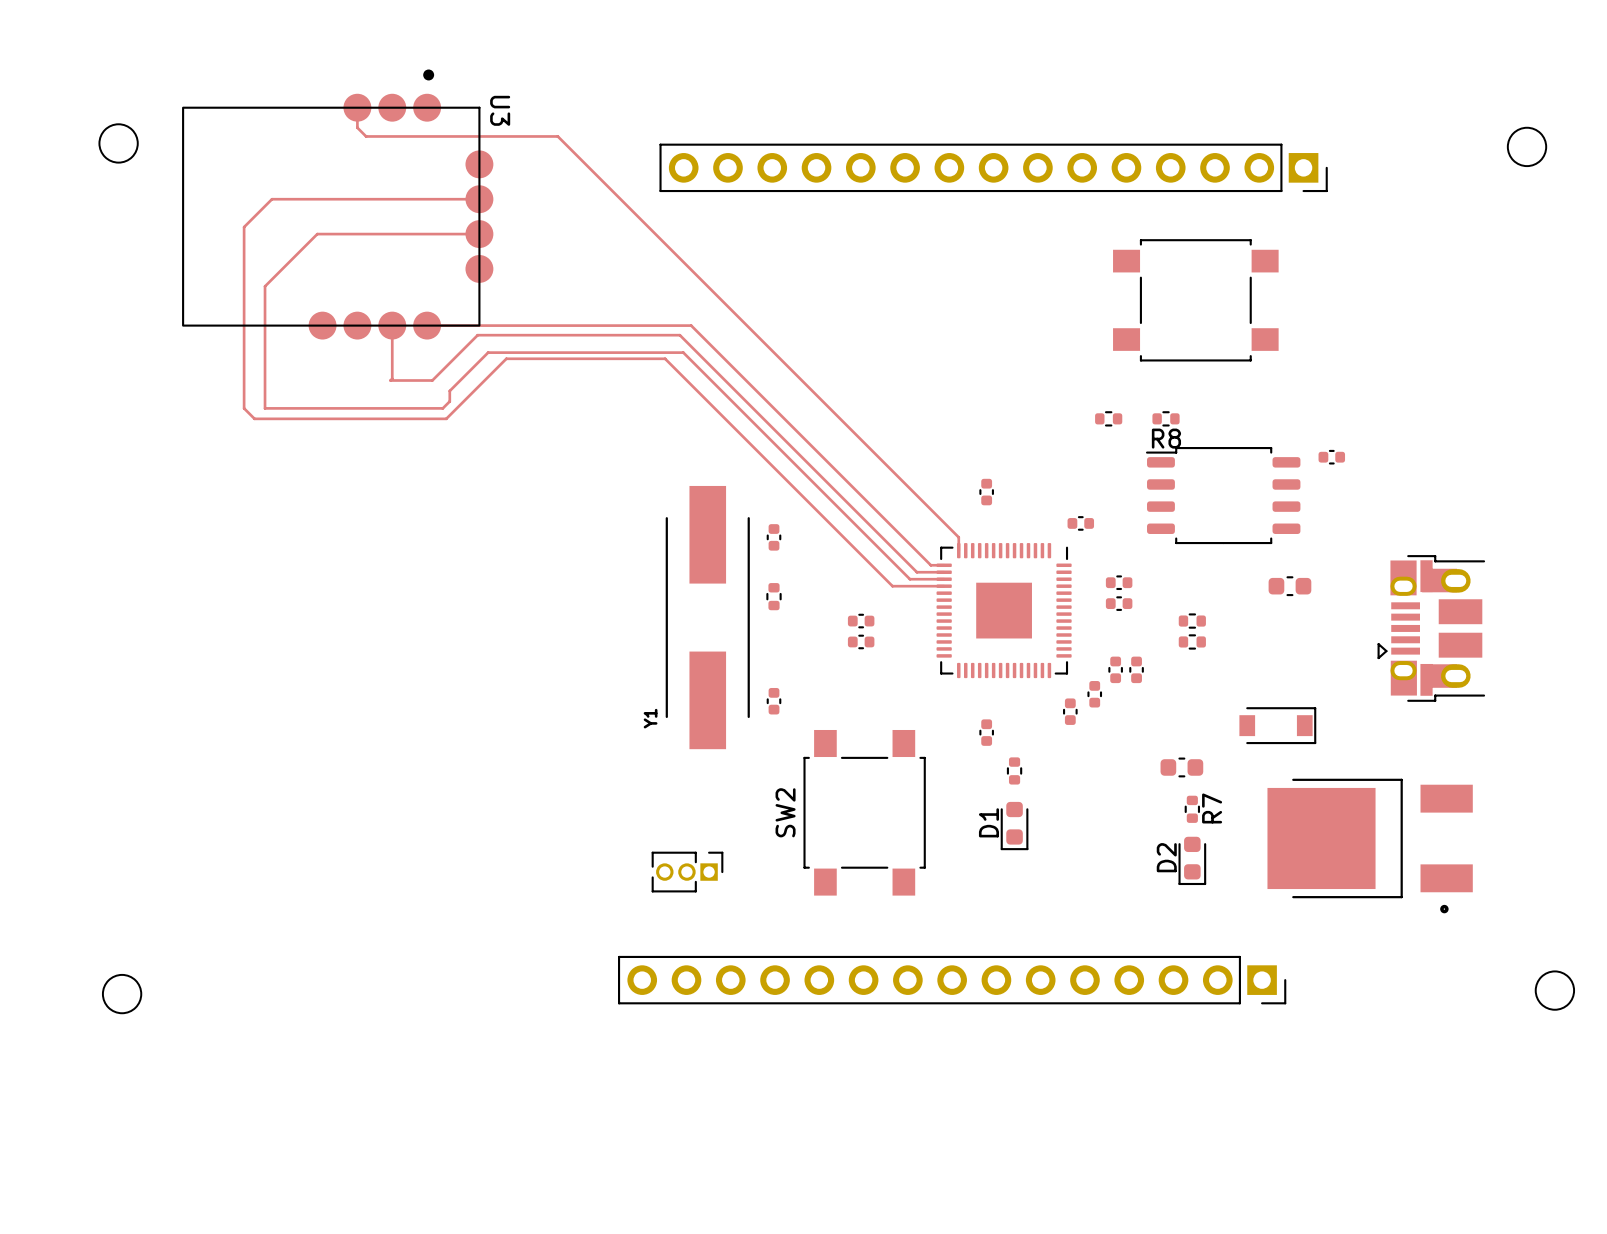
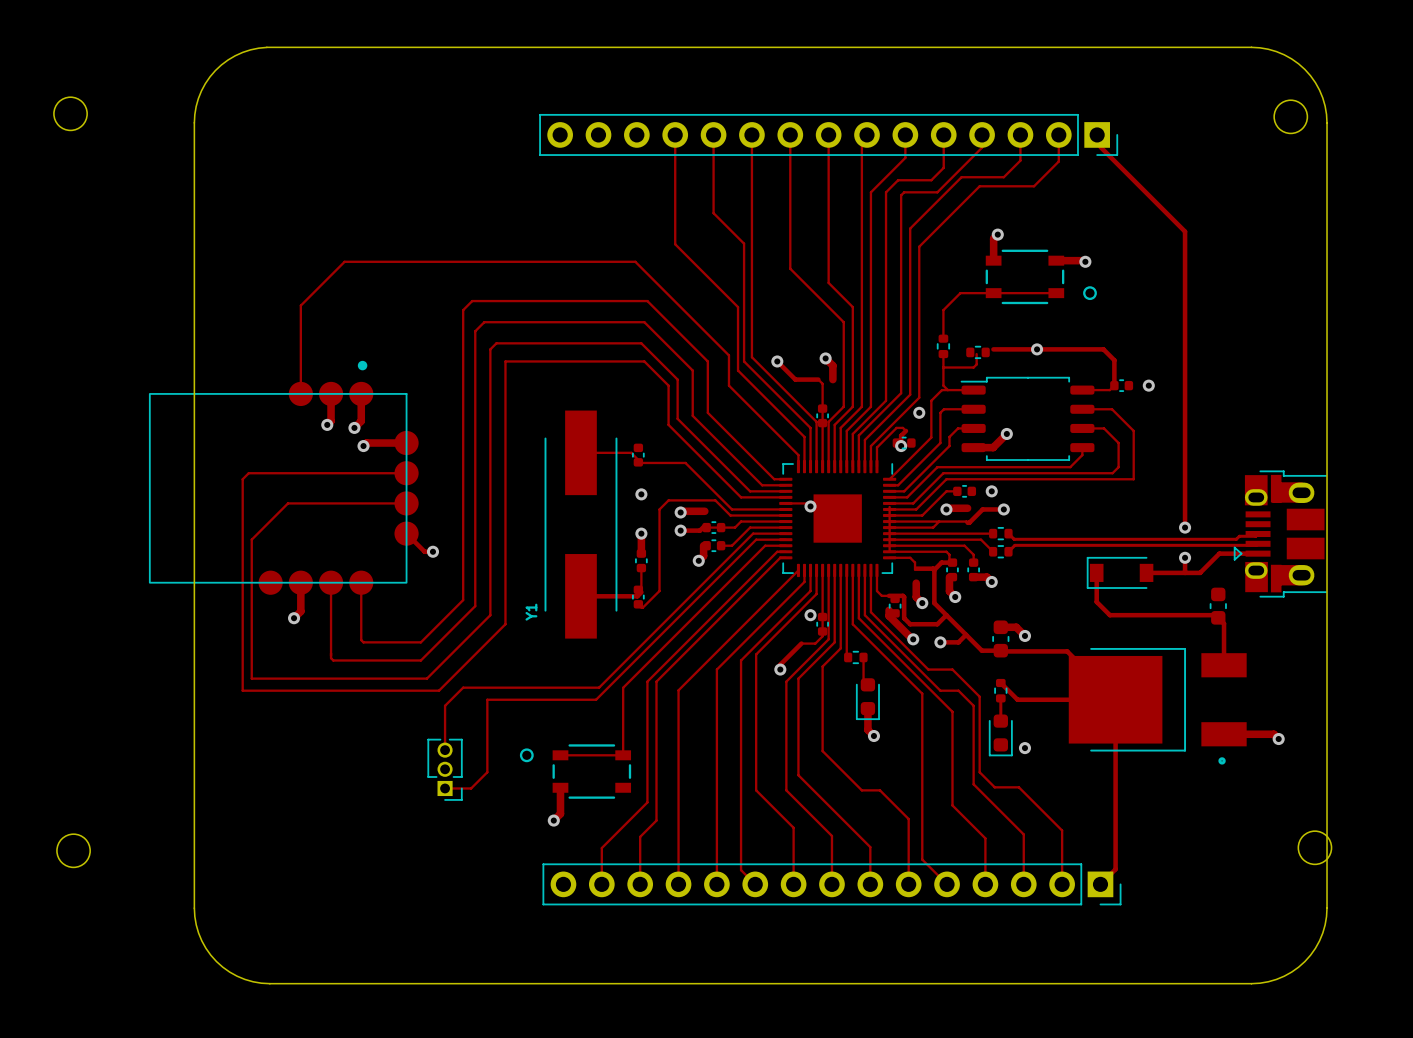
board edge: none -> (266, 47) (1251, 47) (1276, 51) (1298, 63) (1310, 75) (1319, 90) (1325, 106) (1327, 122) (1327, 908) (1322, 933) (1310, 955) (1298, 967) (1284, 976) (1268, 981) (1251, 983) (269, 983) (244, 979) (222, 967) (210, 955) (201, 940) (196, 924) (194, 908) (194, 122) (198, 98) (205, 83) (215, 70) (228, 59) (242, 52) (266, 47)
track: (357, 107) (357, 127) (366, 136) (557, 136) (878, 457) -> (300, 393) (300, 305) (344, 261) (635, 261) (728, 355) (728, 385)
track: none -> (675, 134) (675, 244) (738, 307) (738, 370) (804, 436) (804, 466)
track: none -> (713, 134) (713, 213) (744, 243) (744, 361) (810, 427) (810, 466)
track: none -> (751, 134) (751, 357) (816, 421) (816, 466)
track: none -> (790, 134) (790, 268) (843, 322) (843, 406) (828, 421) (828, 466)
track: none -> (828, 134) (828, 282) (852, 307) (852, 406) (834, 424) (834, 466)
track: none -> (867, 134) (861, 140) (861, 406) (840, 427) (840, 466)
track: none -> (905, 134) (905, 157) (870, 192) (870, 406) (846, 430) (846, 466)
track: none -> (943, 134) (943, 167) (931, 180) (898, 180) (886, 192) (886, 400) (852, 433) (852, 466)
track: none -> (982, 134) (982, 147) (937, 192) (904, 192) (901, 195) (901, 393) (858, 435) (858, 466)
track: none -> (1020, 134) (1020, 160) (1003, 177) (961, 177) (910, 228) (910, 394) (864, 440) (864, 466)
track: none -> (1058, 134) (1058, 161) (1034, 186) (979, 186) (919, 246) (919, 397) (870, 446) (870, 466)
track: none -> (1100, 147) (1185, 231) (1185, 527)
track: (479, 199) (271, 199) (244, 227) (244, 408) (254, 418) (446, 418) (506, 358) (665, 358) (808, 502) -> (406, 473) (248, 473) (242, 479) (242, 690) (439, 690) (505, 624) (505, 361) (644, 361) (668, 385) (668, 424)
U3: (337, 204) -> none
track: (479, 234) (317, 234) (265, 286) (265, 408) (442, 408) (449, 401) (449, 390) (488, 352) (683, 352) (909, 579) -> (406, 503) (288, 503) (251, 539) (251, 678) (426, 678) (490, 615) (490, 349) (496, 343) (641, 343) (677, 379) (677, 418) (750, 491) (756, 491)
track: none -> (997, 234) (993, 238) (993, 260)
via: none -> (997, 234)
part: (1195, 300) -> none
track: none -> (1056, 260) (1085, 261)
via: none -> (1085, 261)
track: (392, 325) (392, 378) (390, 380) (432, 380) (477, 335) (679, 335) (836, 492) -> (331, 582) (331, 658) (333, 660) (420, 660) (475, 606) (475, 331) (484, 322) (644, 322) (692, 370) (692, 415)
track: (427, 325) (691, 325) (854, 488) -> (361, 582) (361, 640) (363, 642) (420, 642) (463, 600) (463, 310) (472, 301) (647, 301) (707, 361) (707, 412)
part: none -> (1041, 276)
track: none -> (1056, 293) (960, 293) (943, 310) (943, 338)
track: none -> (993, 349) (1103, 349) (1114, 360) (1114, 385) (1109, 390) (1082, 390)
via: none -> (1037, 349)
part rotation: 0° (1108, 418) -> 90° clockwise (943, 346)
part position: (1108, 418) -> (943, 346)
track: none -> (943, 354) (943, 385) (947, 390)
track: none -> (976, 354) (976, 364) (973, 367) (943, 367)
track: none -> (825, 358) (832, 365) (832, 379)
via: none -> (825, 358)
track: none -> (777, 361) (795, 379) (818, 379) (822, 383) (822, 466)
via: none -> (777, 361)
R8 name: R8 (1166, 438) -> none
via: none -> (1148, 385)
track: none -> (973, 390) (941, 390) (931, 400) (931, 437) (889, 479)
track: none -> (331, 393) (331, 421) (327, 424)
track: none -> (361, 393) (361, 421) (354, 427)
track: none -> (973, 409) (943, 409) (940, 412) (940, 443) (898, 485) (889, 485)
track: none -> (1082, 409) (1112, 409) (1133, 430) (1133, 479) (946, 479) (916, 509) (889, 509)
via: none -> (919, 412)
via: none -> (327, 424)
via: none -> (354, 427)
track: none -> (973, 428) (958, 428) (949, 436) (949, 446) (904, 491) (889, 491)
track: none -> (1082, 428) (1104, 428) (1118, 443) (1118, 467) (1112, 473) (943, 473) (913, 503) (889, 503)
track: none -> (1006, 433) (993, 447) (973, 447)
via: none -> (1006, 433)
track: none -> (406, 443) (366, 443) (363, 446)
via: none -> (363, 446)
track: none -> (901, 446) (901, 435) (905, 430) (902, 427) (896, 427) (876, 447) (876, 466)
via: none -> (901, 446)
track: none -> (1082, 447) (1082, 455) (1070, 467) (937, 467) (907, 497) (889, 497)
track: none -> (580, 452) (631, 452) (641, 462) (685, 462) (732, 509) (785, 509)
part: none -> (283, 477)
track: none -> (957, 491) (946, 491) (922, 515) (889, 515)
part: none -> (964, 491)
via: none -> (991, 491)
via: none -> (641, 494)
part: (1119, 582) -> none
part: (1289, 586) -> none
track: none -> (785, 503) (807, 503) (810, 506)
part: (774, 596) -> none
via: none -> (810, 506)
track: none -> (889, 507) (889, 551) (946, 551) (949, 554) (949, 562) (941, 562) (934, 569)
track: none -> (967, 508) (946, 509)
via: none -> (946, 509)
track: none -> (1003, 509) (982, 509) (969, 522) (889, 521)
via: none -> (1003, 509)
track: none -> (704, 511) (680, 512)
via: none -> (680, 512)
part: (1119, 603) -> none
track: none -> (785, 515) (730, 515) (715, 500) (668, 500) (659, 509) (659, 591) (641, 607)
track: none -> (785, 521) (741, 521) (735, 527) (706, 527) (704, 525) (699, 530) (680, 530)
track: none -> (939, 521) (933, 527) (889, 527)
track: none -> (785, 527) (750, 527) (732, 545) (721, 545)
part: (1192, 621) -> none
via: none -> (1185, 527)
via: none -> (680, 530)
track: none -> (406, 533) (424, 551) (432, 551)
track: none -> (641, 533) (641, 553)
via: none -> (641, 533)
track: none -> (785, 533) (753, 533) (599, 687) (463, 687) (445, 705) (445, 750)
track: none -> (889, 533) (993, 533)
part: none -> (1000, 533)
track: none -> (1008, 533) (1014, 539) (1236, 539) (1239, 536) (1255, 536) (1258, 534)
part position: (1431, 628) -> (1280, 534)
track: none -> (785, 539) (756, 539) (596, 699) (487, 699) (487, 772) (471, 788) (445, 788)
track: none -> (889, 539) (981, 539) (993, 551) (993, 554)
track: none -> (1258, 543) (1256, 545) (1014, 545) (1008, 551)
track: none -> (703, 545) (703, 555) (698, 560)
track: none -> (785, 545) (765, 545) (623, 687) (623, 755) (560, 755)
track: none -> (889, 545) (964, 545) (973, 554) (973, 562)
part: (1192, 641) -> none
via: none -> (432, 551)
track: none -> (785, 551) (777, 551) (647, 681) (647, 802) (601, 848) (601, 884)
part: none -> (1000, 551)
track: none -> (1258, 553) (1219, 553) (1200, 572) (1146, 572)
track: none -> (785, 557) (780, 557) (656, 681) (656, 820) (640, 836) (640, 884)
track: none -> (889, 557) (910, 557) (915, 562) (915, 569)
track: none -> (1185, 557) (1185, 572)
via: none -> (1185, 557)
part: none -> (641, 560)
via: none -> (698, 560)
track: none -> (641, 568) (641, 592) (637, 596) (580, 596)
track: none -> (916, 568) (934, 569)
track: none -> (934, 569) (934, 603) (981, 650) (1000, 650) (1003, 653)
part: (1115, 669) -> none
part: none -> (973, 569)
track: none -> (798, 570) (678, 690) (678, 884)
track: none -> (804, 570) (804, 581) (716, 669) (716, 884)
track: none -> (810, 570) (810, 591) (741, 660) (741, 870) (755, 884)
track: none -> (816, 570) (816, 594) (756, 654) (756, 790) (793, 827) (793, 884)
track: none -> (822, 570) (822, 636) (815, 643) (801, 643) (780, 664) (780, 669)
track: none -> (828, 570) (828, 639) (786, 681) (786, 790) (831, 835) (831, 884)
track: none -> (834, 570) (834, 642) (798, 678) (798, 775) (870, 847) (870, 884)
track: none -> (840, 570) (840, 648) (822, 666) (822, 751) (861, 790) (880, 790) (908, 819) (908, 884)
track: none -> (846, 570) (848, 657)
track: none -> (852, 570) (852, 624) (922, 693) (922, 859) (947, 884)
track: none -> (858, 570) (858, 618) (952, 711) (952, 805) (985, 838) (985, 884)
track: none -> (864, 570) (864, 615) (940, 690) (958, 690) (973, 705) (973, 784) (1023, 834) (1023, 884)
track: none -> (870, 570) (870, 612) (928, 669) (952, 669) (979, 696) (979, 772) (994, 787) (1018, 787) (1062, 830) (1062, 884)
track: none -> (876, 570) (876, 591) (881, 595) (902, 595) (904, 618) (910, 624) (937, 624) (946, 615)
track: none -> (1096, 572) (1096, 601) (1109, 615) (1215, 615) (1224, 623) (1224, 665)
track: none -> (949, 577) (949, 591) (955, 597)
track: none -> (973, 577) (986, 577) (991, 581)
via: none -> (991, 581)
track: none -> (300, 582) (300, 611) (294, 618)
track: none -> (916, 583) (916, 597) (922, 603)
part: (1094, 694) -> none
via: none -> (955, 597)
via: none -> (922, 603)
part: none -> (1218, 606)
track: none -> (889, 610) (889, 615) (913, 639)
via: none -> (810, 615)
via: none -> (294, 618)
part rotation: 0° (1277, 725) -> 180° (1120, 572)
part position: (1277, 725) -> (1120, 572)
track: none -> (1000, 627) (1016, 627) (1024, 635)
track: none -> (966, 634) (958, 642) (940, 642)
via: none -> (1024, 635)
via: none -> (913, 639)
via: none -> (940, 642)
track: none -> (1006, 651) (1067, 651) (1115, 699)
part rotation: 0° (1181, 767) -> 90° clockwise (1000, 638)
part rotation: 0° (1014, 770) -> 90° clockwise (855, 657)
track: none -> (863, 657) (863, 680) (867, 684)
via: none -> (780, 669)
track: none -> (1000, 682) (1017, 699) (1115, 699)
R7 name: R7 (1212, 808) -> none
SW2: (864, 812) -> none
track: none -> (1000, 698) (1000, 721)
part: none -> (867, 699)
track: none -> (1115, 699) (1115, 869) (1100, 884)
D1: (1014, 826) -> none
track: none -> (867, 708) (867, 729) (873, 736)
part position: (1370, 846) -> (1157, 706)
D2 name: D2 (1166, 857) -> none
track: none -> (1224, 734) (1273, 734) (1278, 739)
via: none -> (873, 736)
via: none -> (1278, 739)
part rotation: 0° (687, 872) -> 90° clockwise (445, 769)
part position: (687, 872) -> (445, 769)
via: none -> (1024, 748)
part: none -> (575, 771)
track: none -> (560, 787) (560, 813) (553, 820)
via: none -> (553, 820)
part position: (952, 980) -> (831, 884)

